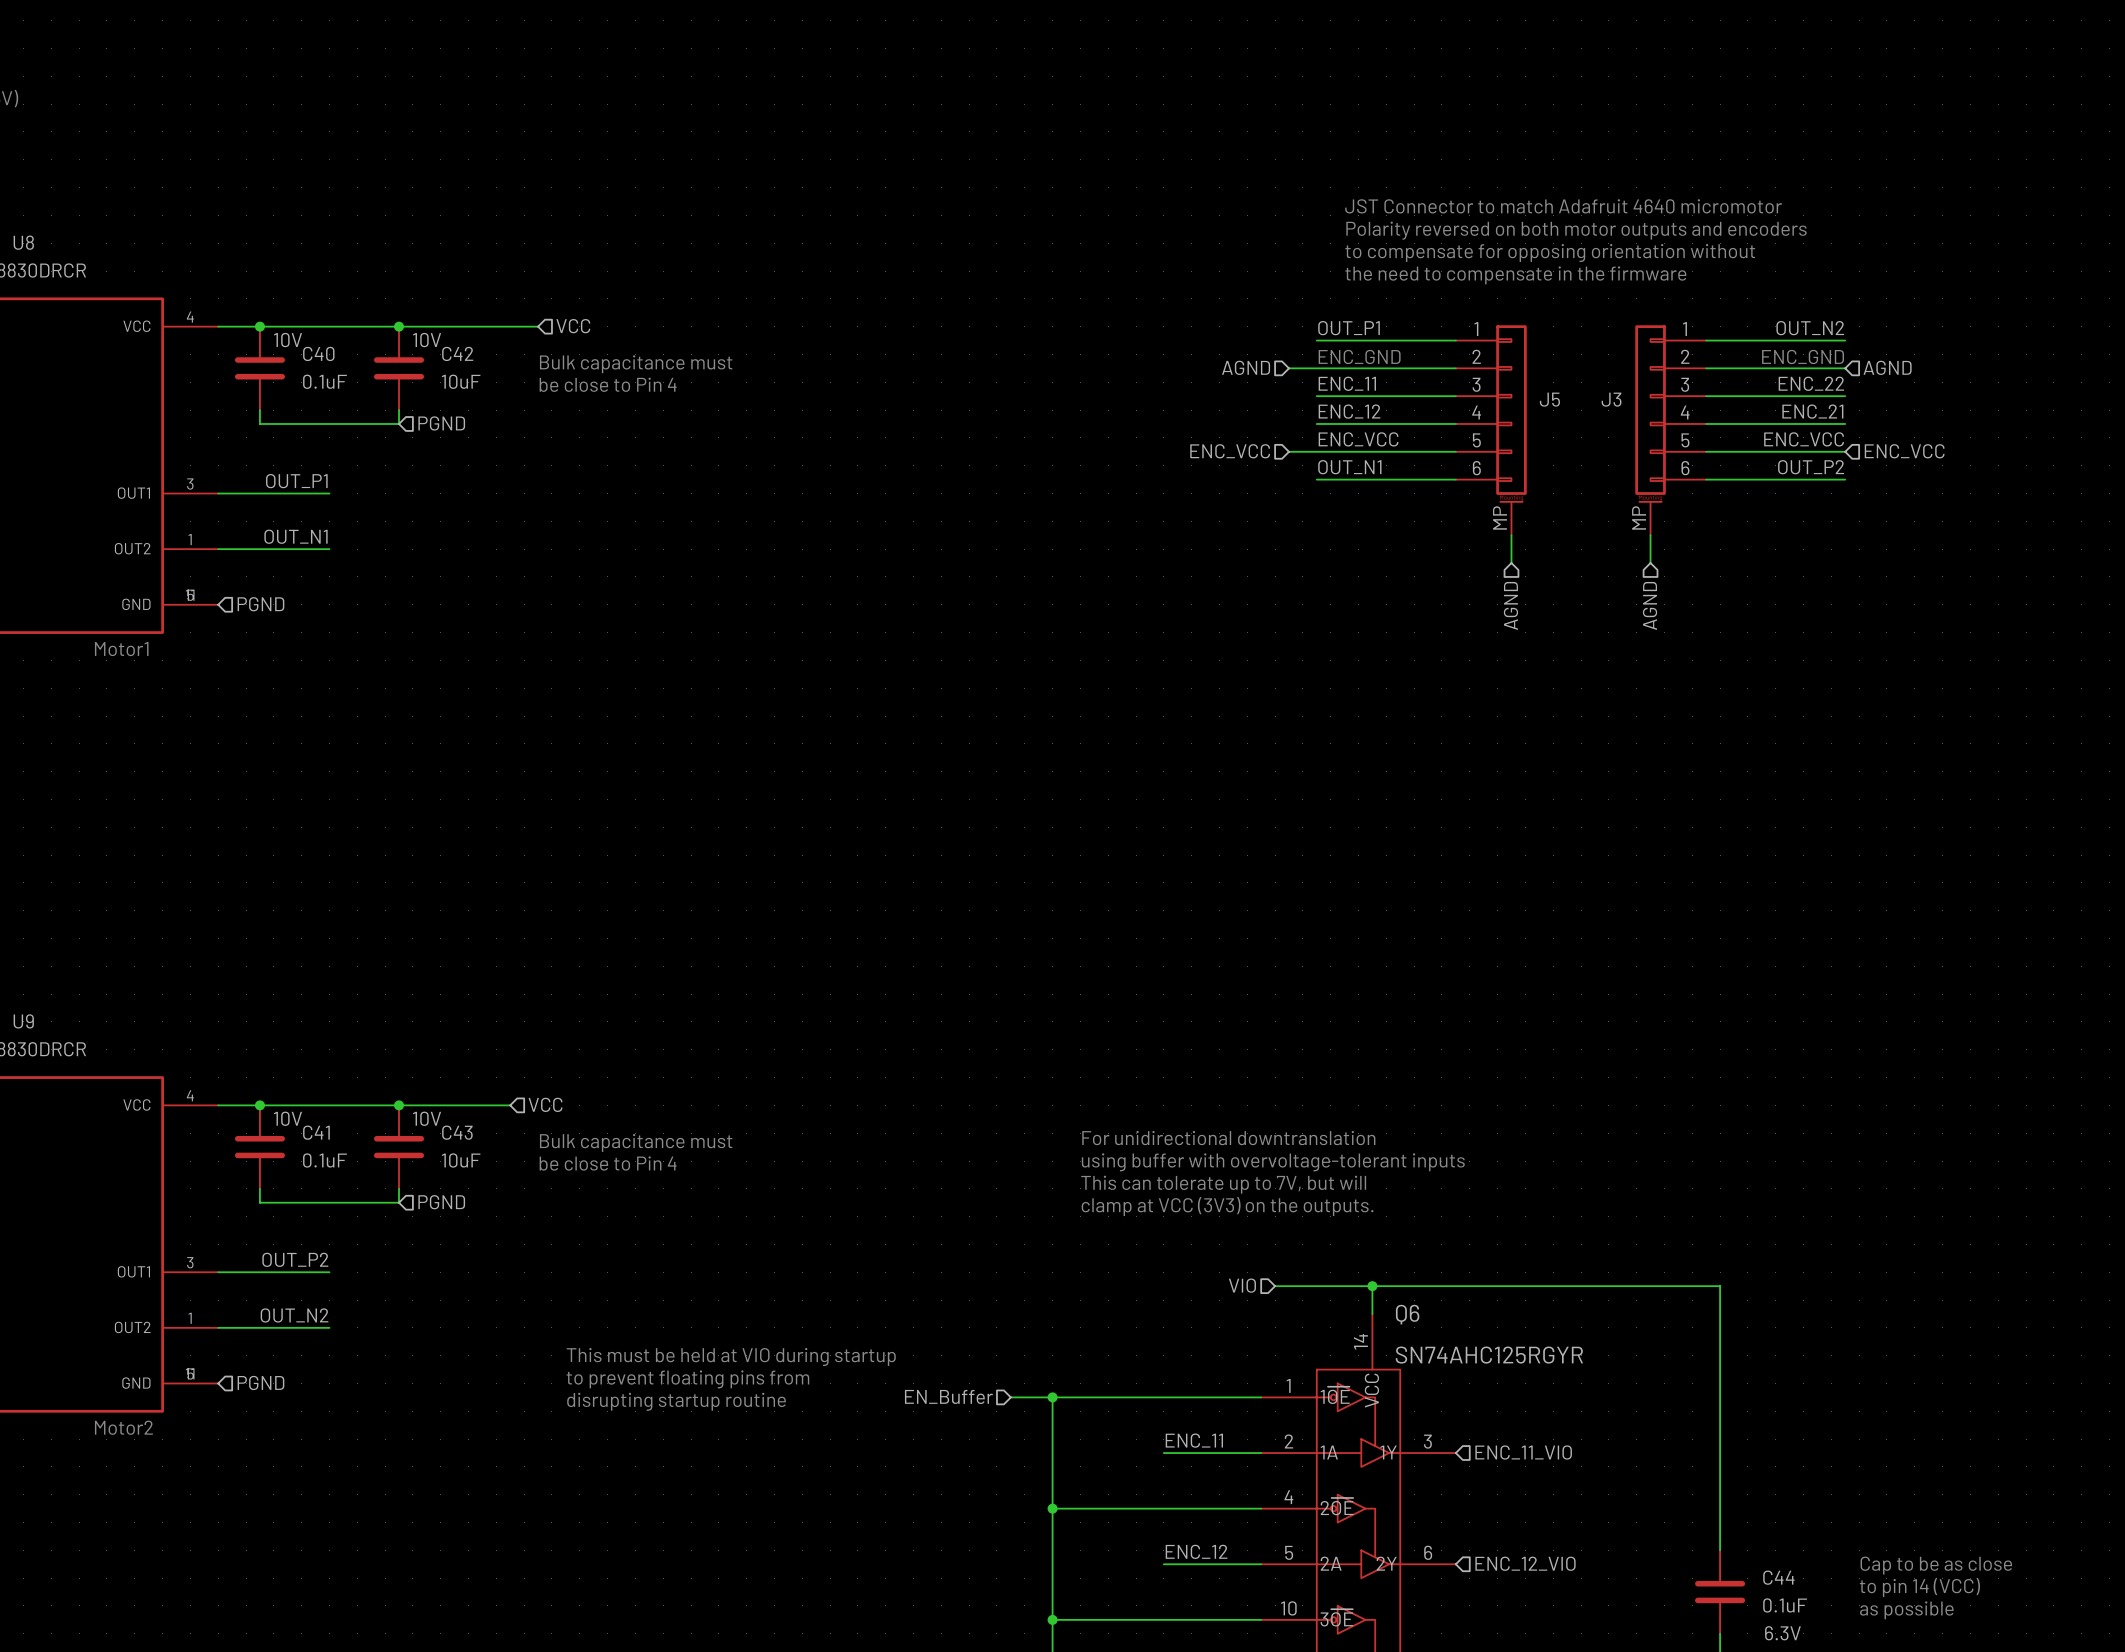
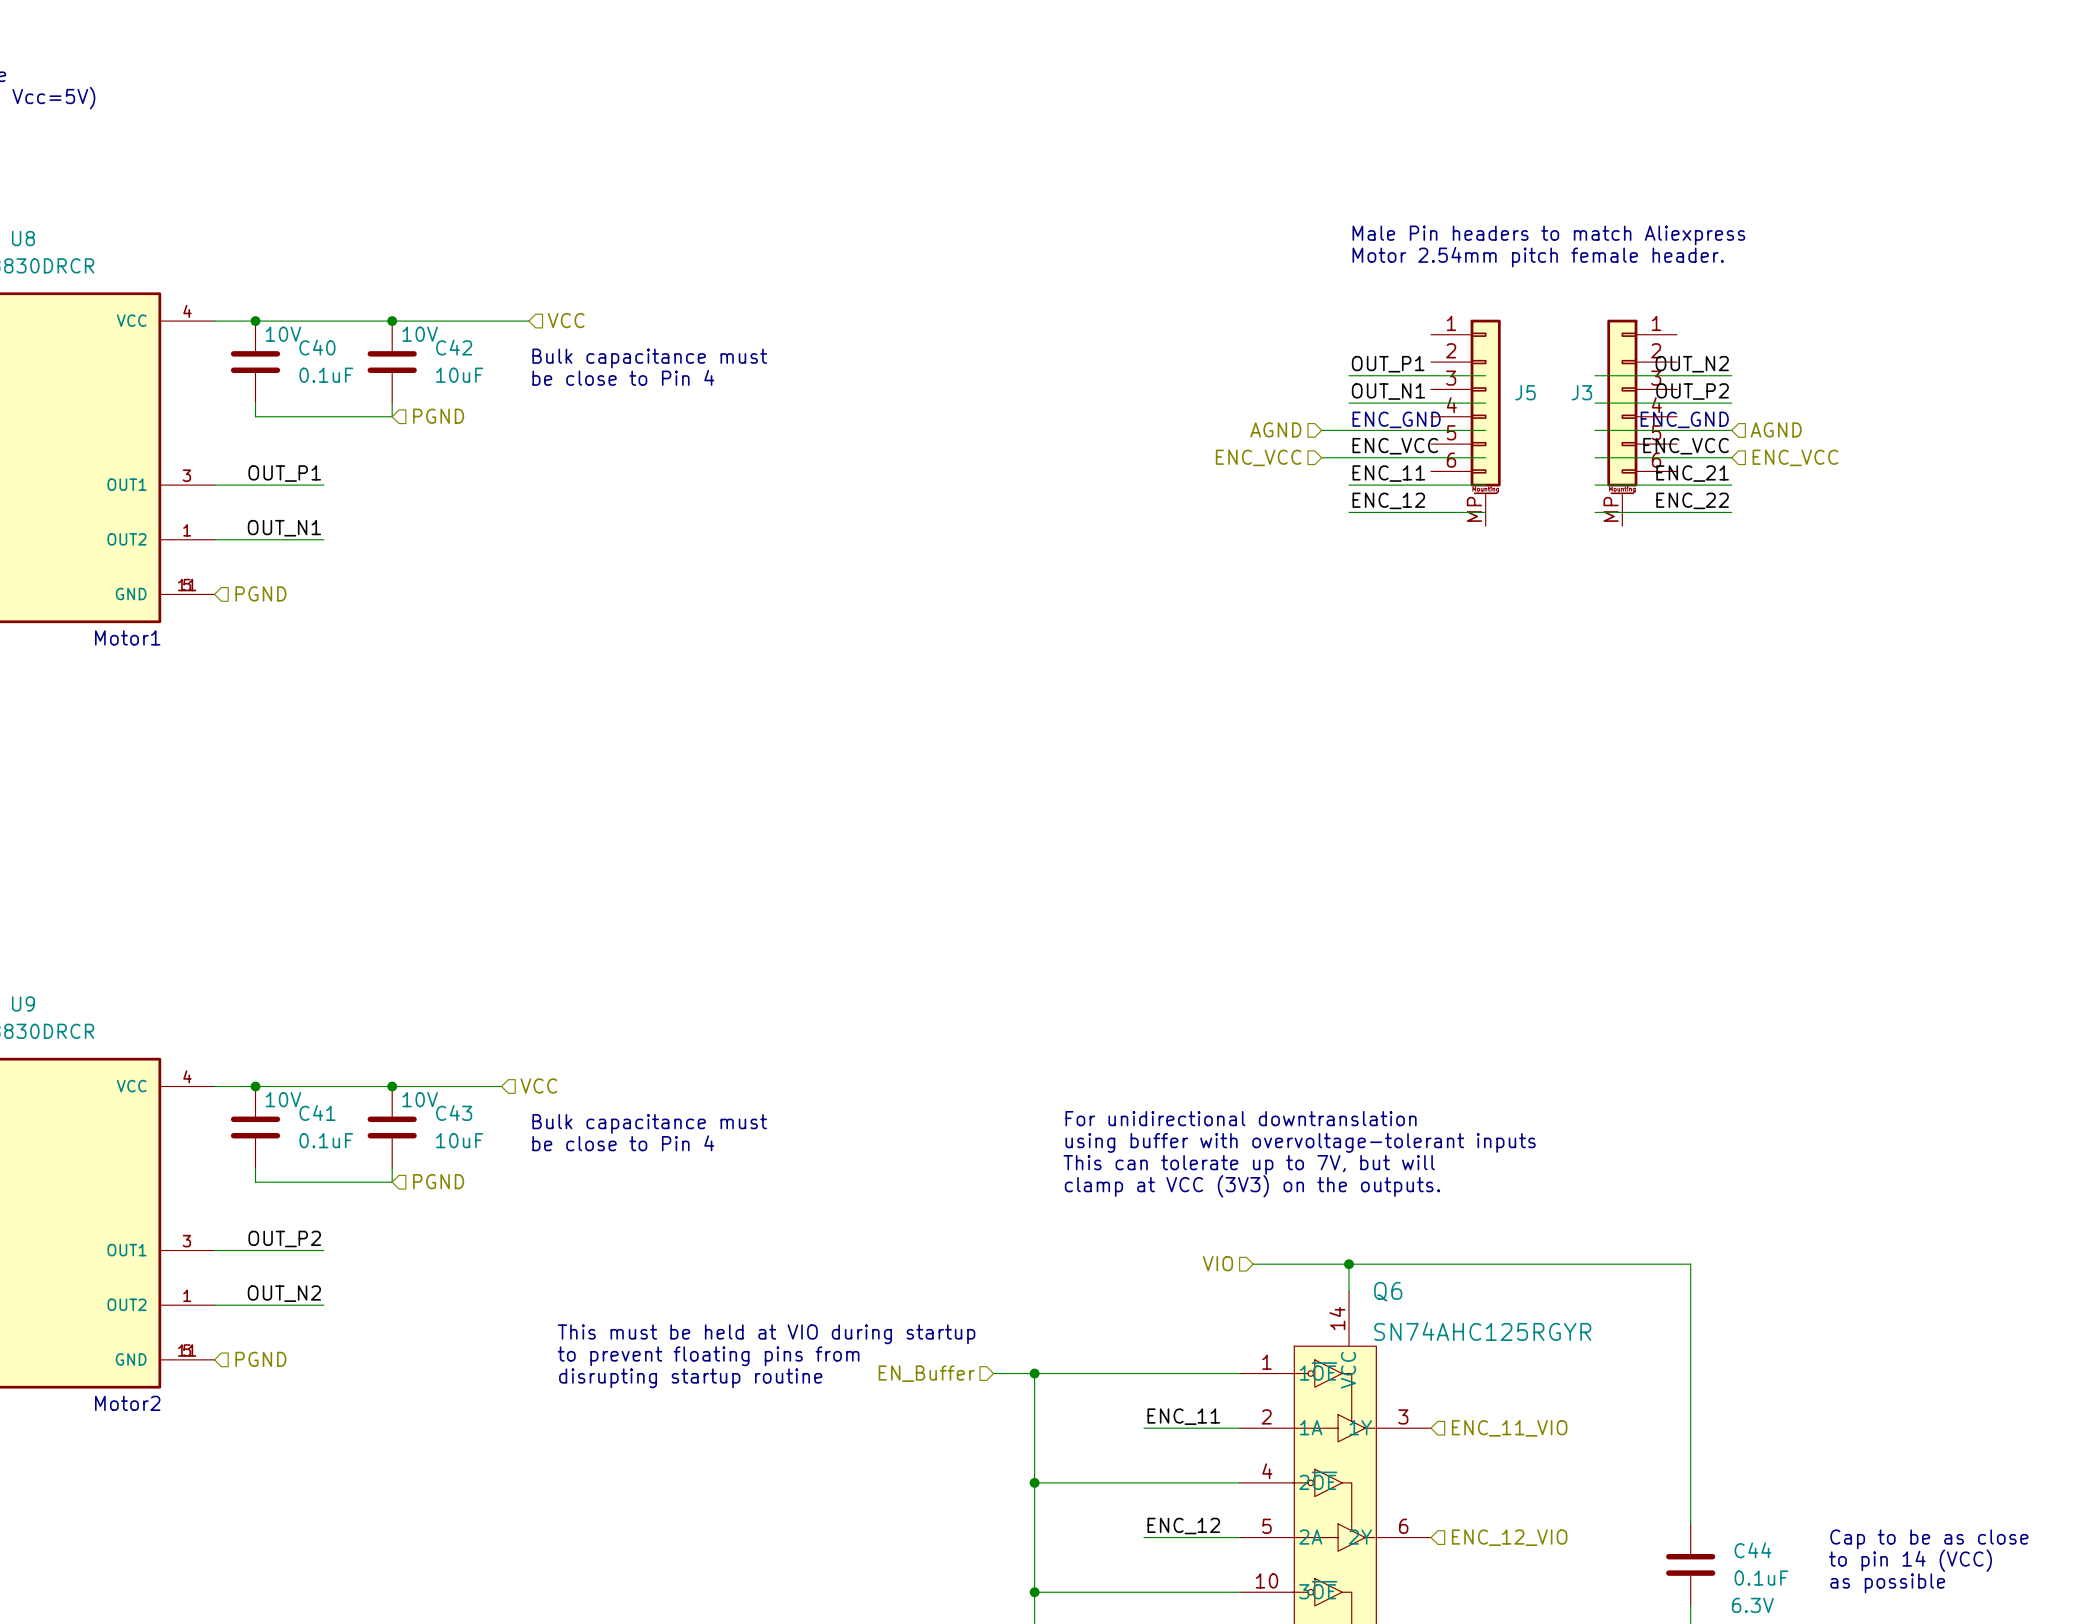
text: JST Connector to match Adafruit 4640 micromotor (1563, 206) -> none
text: Polarity reversed on both motor outputs and encoders (1576, 230) -> none
text: none -> Male Pin headers to match Aliexpress (1548, 235)
text: to compensate for opposing orientation without (1550, 253) -> none
text: none -> Motor 2.54mm pitch female header. (1538, 257)
text: the need to compensate in the firmware (1515, 275) -> none
label position: OUT_P1 (1349, 328) -> OUT_P1 (1388, 364)
label position: OUT_N2 (1810, 328) -> OUT_N2 (1692, 364)
wire: (1316, 340) (1455, 340) -> (1348, 512) (1485, 512)
wire: (1706, 340) (1845, 340) -> (1595, 375) (1731, 375)
text position: ENC_GND (1359, 356) -> ENC_GND (1396, 419)
text position: ENC_GND (1803, 356) -> ENC_GND (1684, 419)
hierarchical label position: AGND (1246, 367) -> AGND (1275, 429)
hierarchical label: AGND (1887, 367) -> none
wire: (1288, 368) (1455, 368) -> (1321, 457) (1485, 457)
wire: (1706, 368) (1845, 368) -> (1595, 403) (1731, 403)
label position: ENC_11 (1347, 383) -> ENC_11 (1388, 473)
label position: ENC_22 (1811, 383) -> ENC_22 (1692, 500)
wire: (1316, 396) (1455, 396) -> (1348, 375) (1485, 375)
wire: (1706, 396) (1845, 396) -> (1595, 430) (1731, 430)
label position: ENC_12 (1349, 411) -> ENC_12 (1388, 500)
label position: ENC_21 (1812, 411) -> ENC_21 (1692, 473)
wire: (1316, 423) (1455, 423) -> (1348, 403) (1485, 403)
wire: (1706, 423) (1845, 423) -> (1595, 457) (1731, 457)
hierarchical label: none -> AGND (1776, 429)
label position: ENC_VCC (1358, 439) -> ENC_VCC (1395, 446)
label position: ENC_VCC (1804, 439) -> ENC_VCC (1686, 446)
hierarchical label position: ENC_VCC (1230, 451) -> ENC_VCC (1258, 457)
wire: (1288, 451) (1455, 451) -> (1321, 430) (1485, 430)
wire: (1706, 451) (1845, 451) -> (1595, 485) (1731, 485)
hierarchical label position: ENC_VCC (1904, 451) -> ENC_VCC (1795, 457)
label position: OUT_N1 (1349, 467) -> OUT_N1 (1388, 391)
label position: OUT_P2 (1811, 467) -> OUT_P2 (1692, 391)
wire: (1316, 479) (1455, 479) -> (1348, 485) (1485, 485)
wire: (1706, 479) (1845, 479) -> (1595, 512) (1731, 512)
wire: (1511, 535) (1511, 563) -> none
wire: (1650, 535) (1650, 563) -> none
hierarchical label: AGND (1510, 605) -> none
hierarchical label: AGND (1650, 605) -> none

